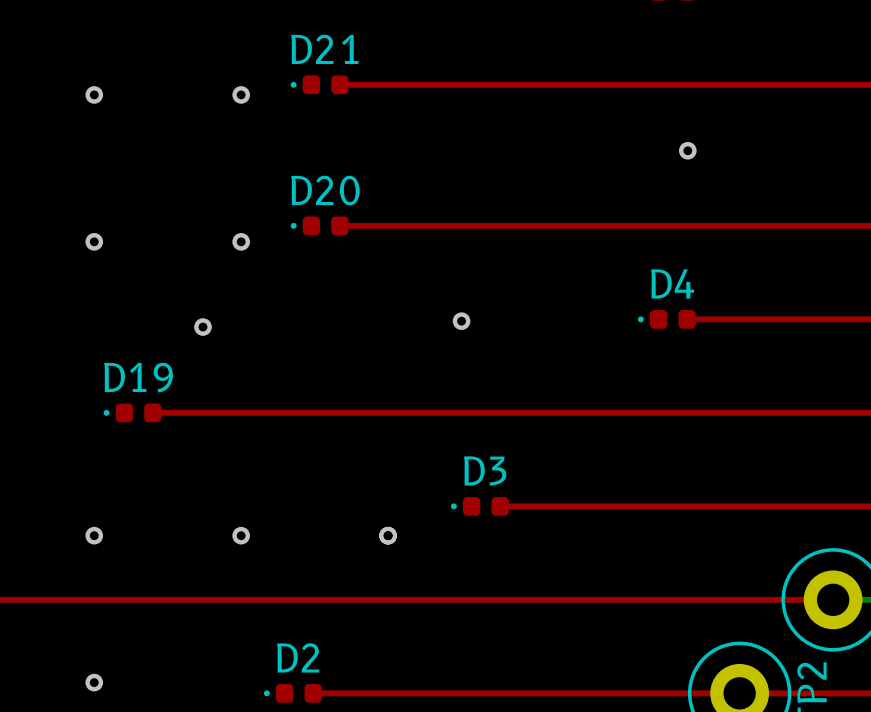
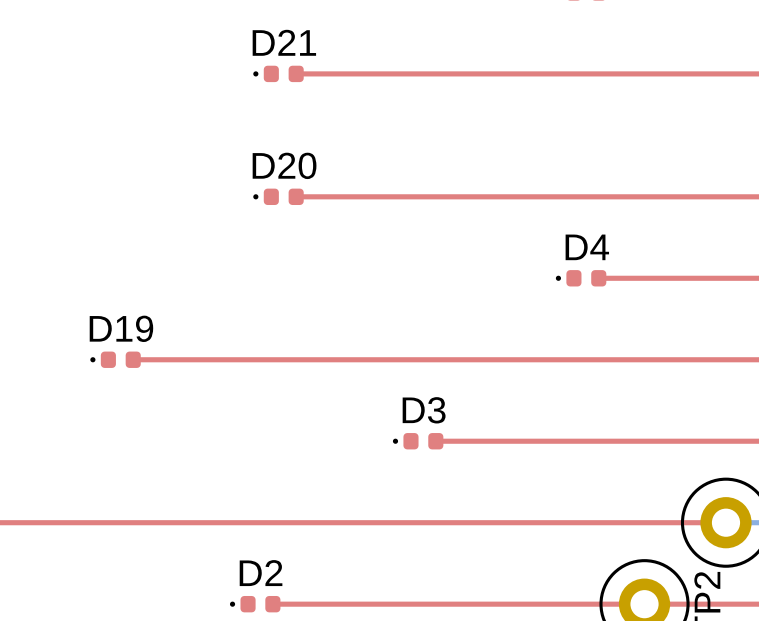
via: (94, 94) -> none
via: (241, 94) -> none
via: (687, 150) -> none
via: (94, 241) -> none
via: (241, 241) -> none
via: (461, 321) -> none
via: (202, 327) -> none
via: (94, 535) -> none
via: (241, 535) -> none
via: (388, 535) -> none
via: (94, 682) -> none

